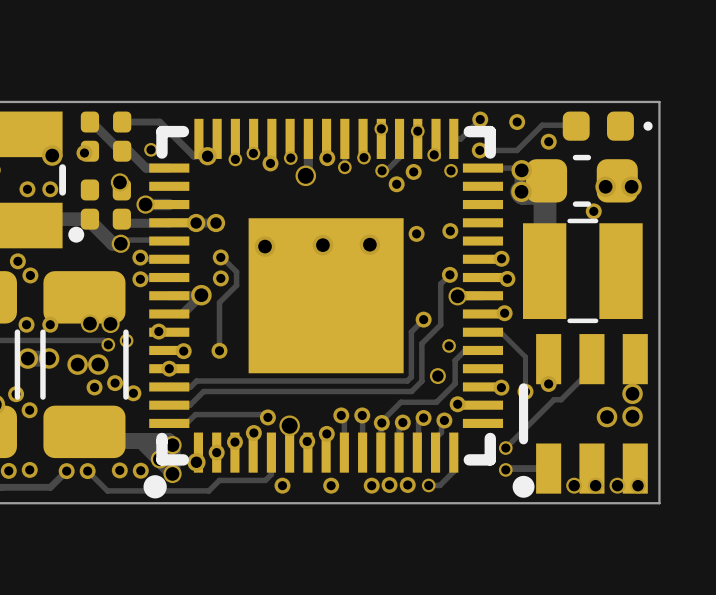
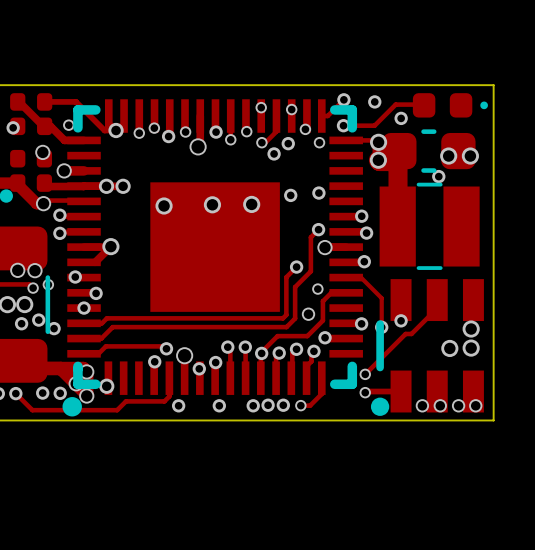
track: (220, 257) (236, 271) (236, 285) (219, 302) (219, 350) -> none
via: (220, 257) -> none
via: (220, 278) -> none
via: (219, 350) -> none
via: (234, 442) -> none
via: (216, 452) -> none

